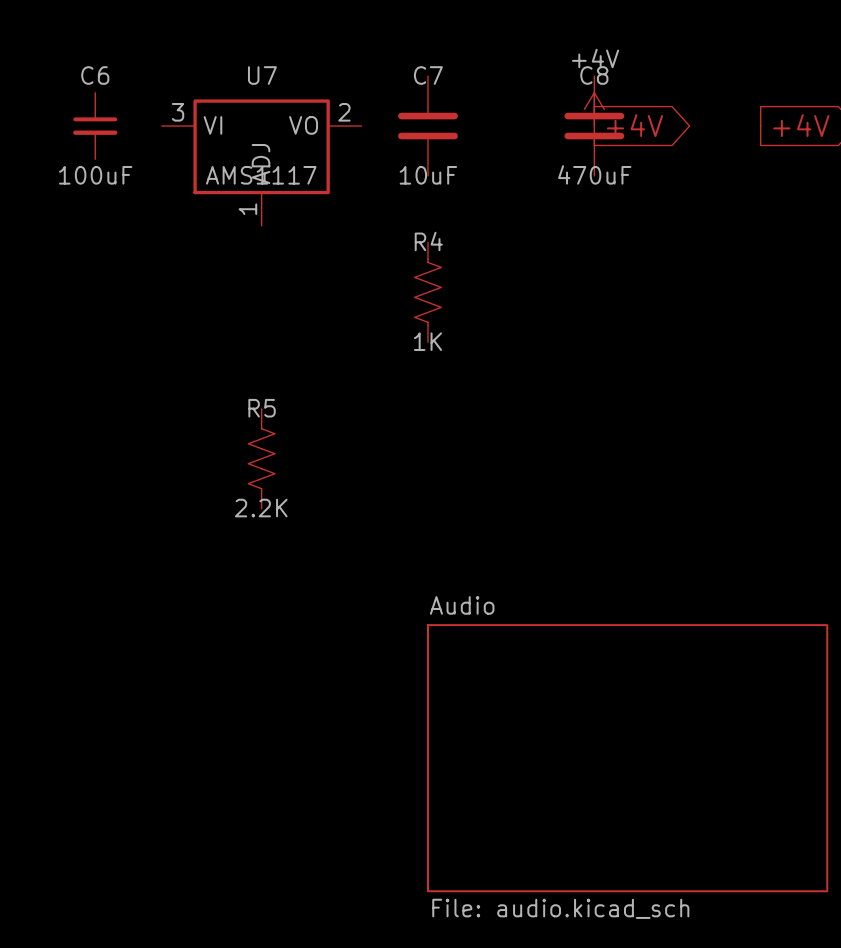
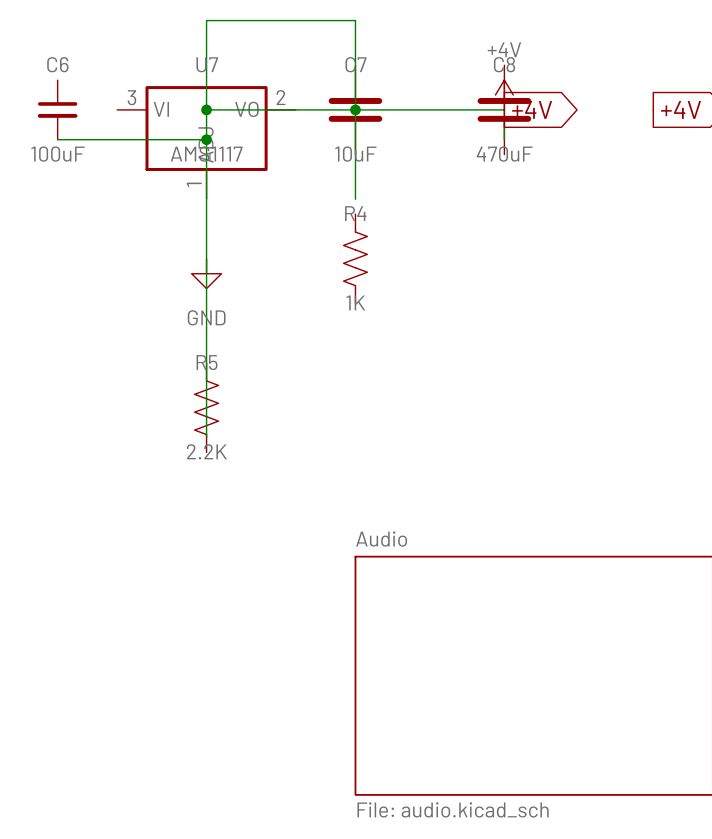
wire: none -> (206, 109) (504, 109) (504, 139)
junction: none -> (206, 109)
junction: none -> (355, 109)
wire: none -> (57, 139) (206, 139)
junction: none -> (206, 139)
wire: none -> (355, 199) (355, 20) (206, 20) (206, 437)
power symbol: none -> GND (206, 273)

